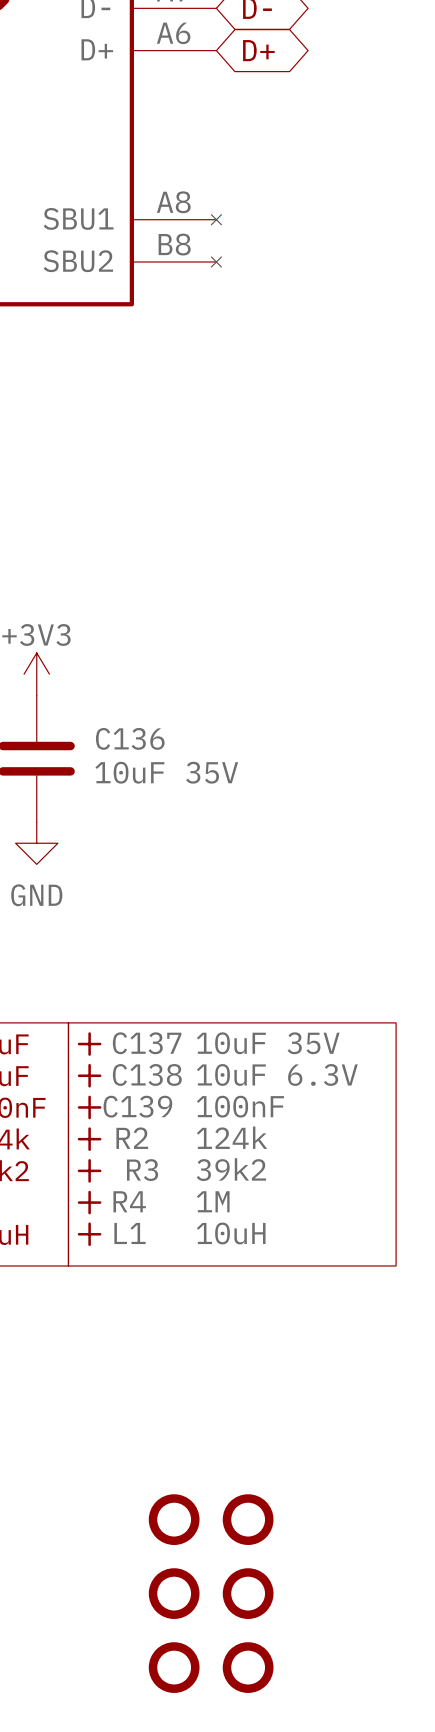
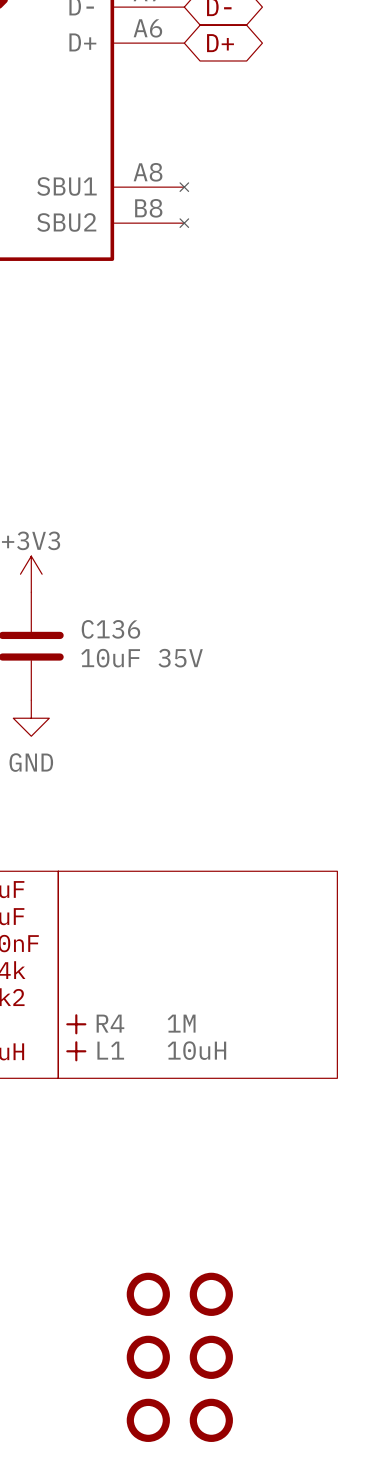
C137: 10uF 35V (89, 1044) -> none
C138: 10uF 6.3V (89, 1075) -> none
C139: 100nF (89, 1107) -> none
R2: 124k (89, 1139) -> none
R3: 39k2 (89, 1170) -> none

